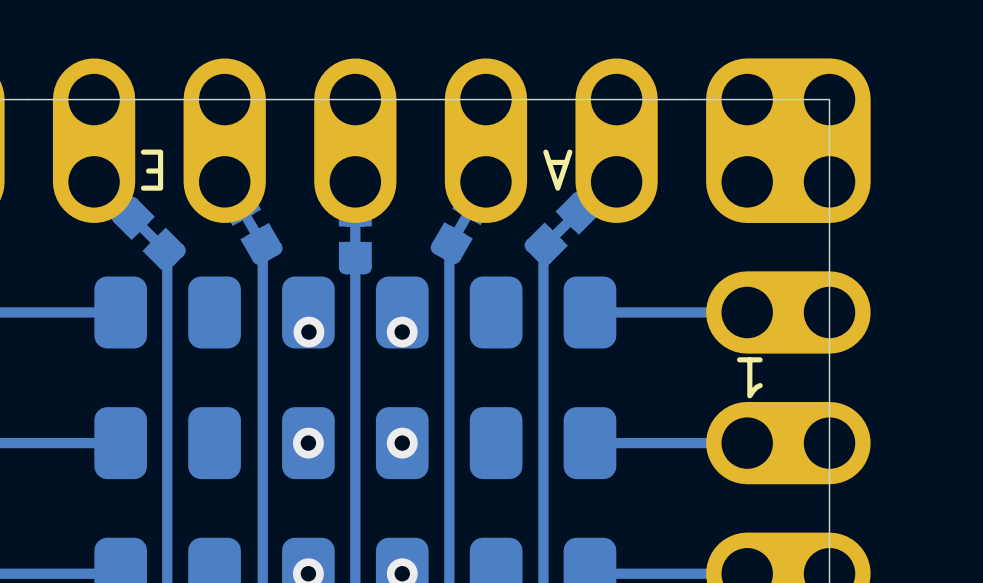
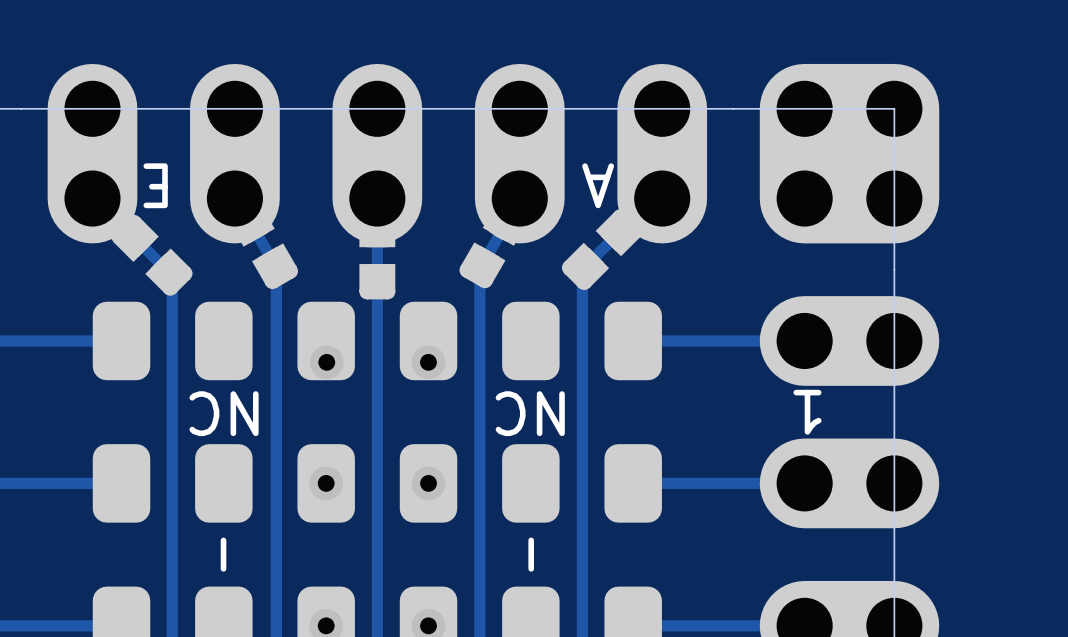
text: none -> NC (224, 413)
text: none -> NC (530, 413)
line: none -> (223, 540) (223, 568)
line: none -> (531, 540) (531, 568)

